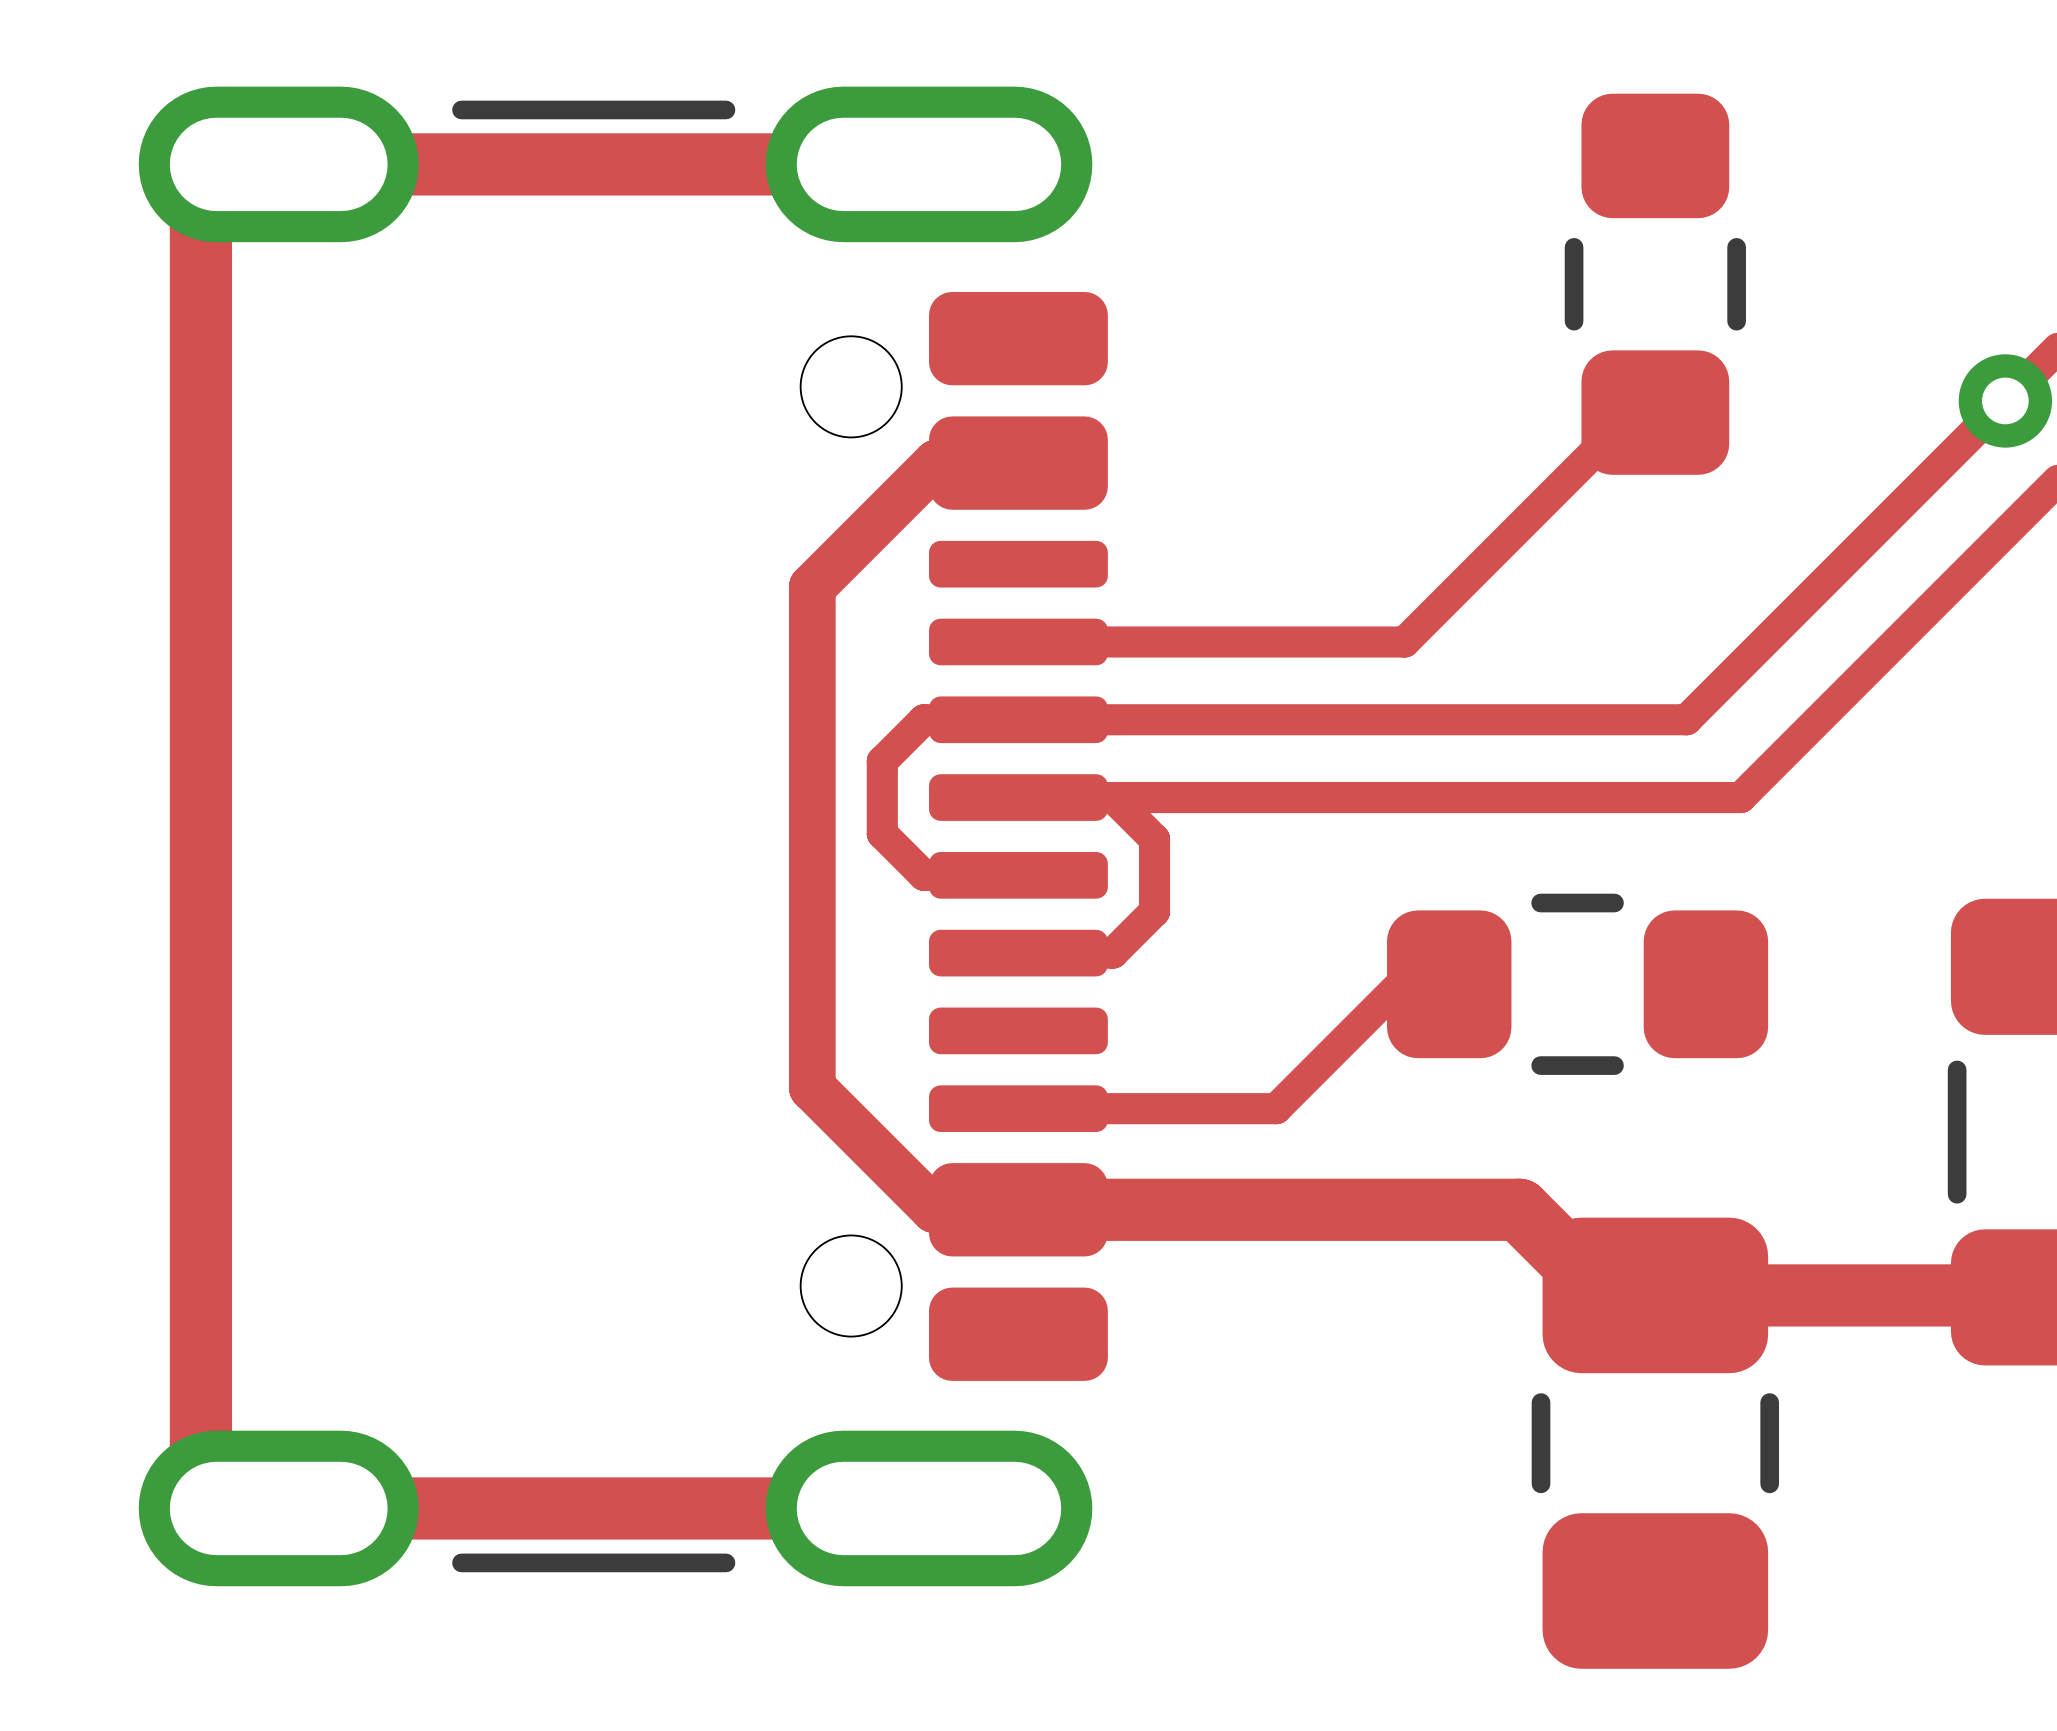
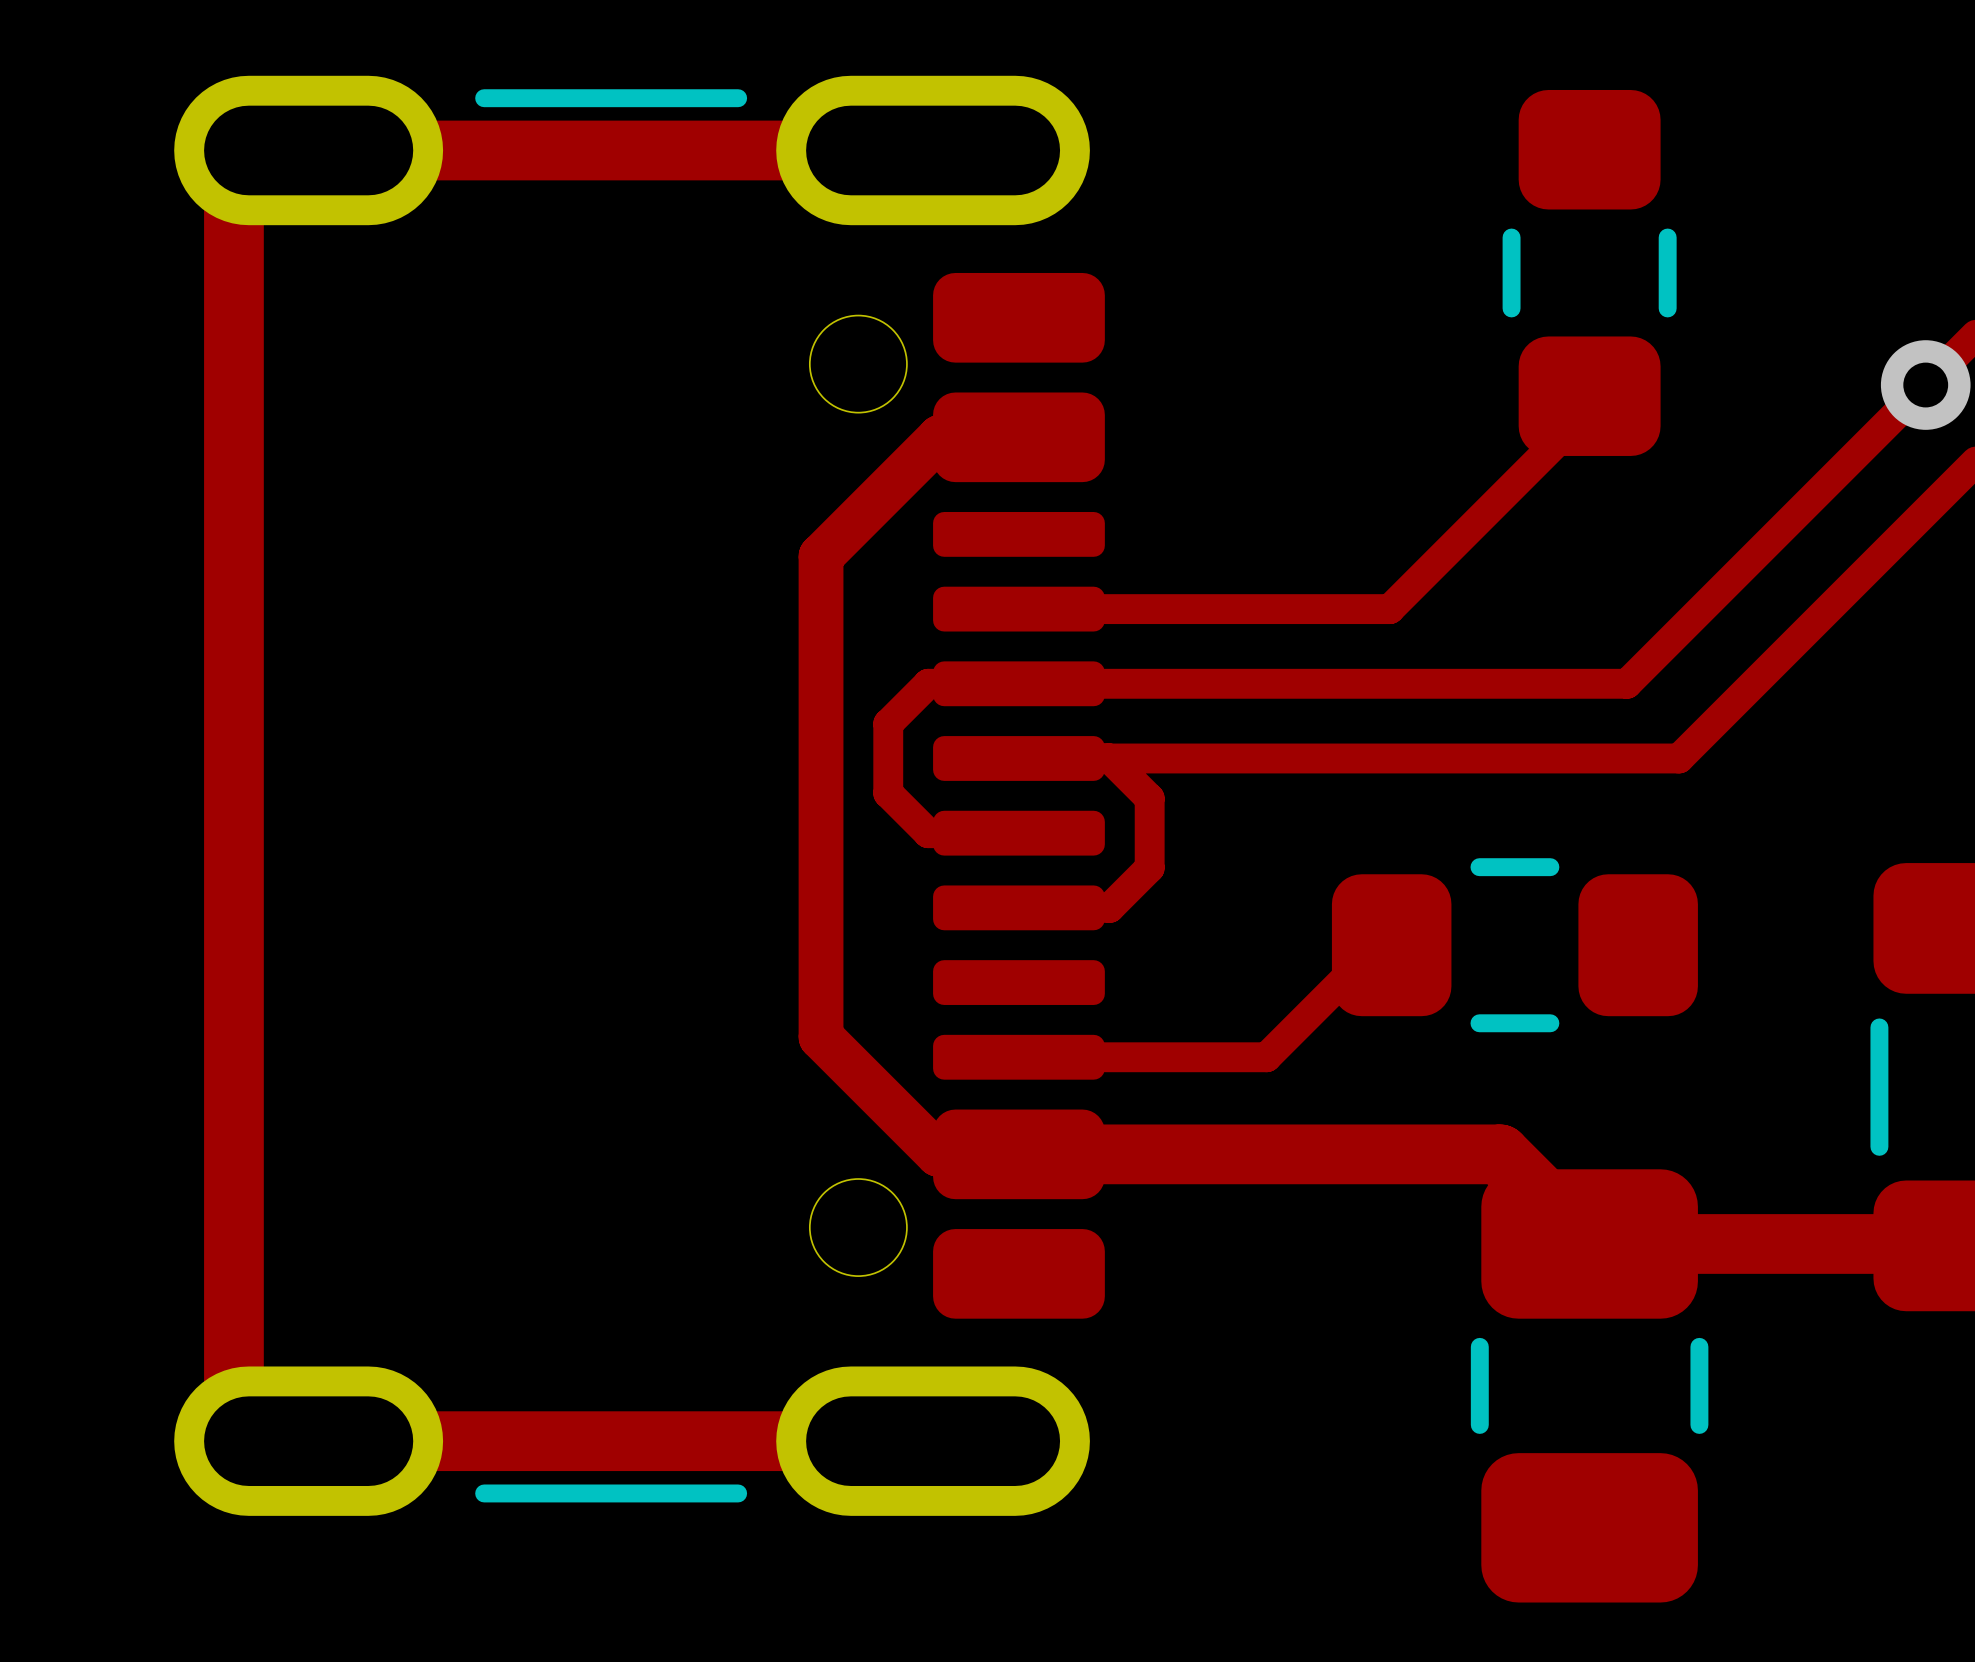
top track: (851, 164) (200, 164) (200, 1508) (851, 1508) -> (858, 150) (233, 150) (233, 1441) (858, 1441)
top track: (1655, 412) (1633, 412) (1404, 641) (1018, 641) -> none
top track: none -> (1589, 409) (1389, 609) (1018, 609)
top track: (1018, 463) (936, 463) (812, 587) (812, 1087) (934, 1209) (1519, 1209) (1604, 1295) (1655, 1295) -> (1018, 437) (940, 437) (821, 556) (821, 1037) (938, 1154) (1499, 1154) (1589, 1243)
top track: (1694, 712) (1686, 719) (923, 719) (882, 761) (882, 833) (923, 875) (1018, 875) -> (1626, 683) (928, 683) (888, 723) (888, 793) (928, 833) (1018, 833)
top track: (1748, 789) (1740, 797) (1018, 797) -> (1679, 758) (1018, 758)
top track: (1112, 797) (1154, 839) (1154, 911) (1112, 953) (1018, 953) -> (1109, 758) (1149, 798) (1149, 867) (1109, 907) (1018, 907)
part position: (623, 836) -> (639, 795)
top track: none -> (1378, 945) (1266, 1057) (1018, 1057)
top track: (1449, 984) (1400, 984) (1276, 1108) (1018, 1108) -> none

